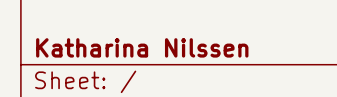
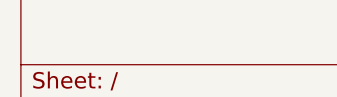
title block: Katharina Nilssen (142, 47) -> none

